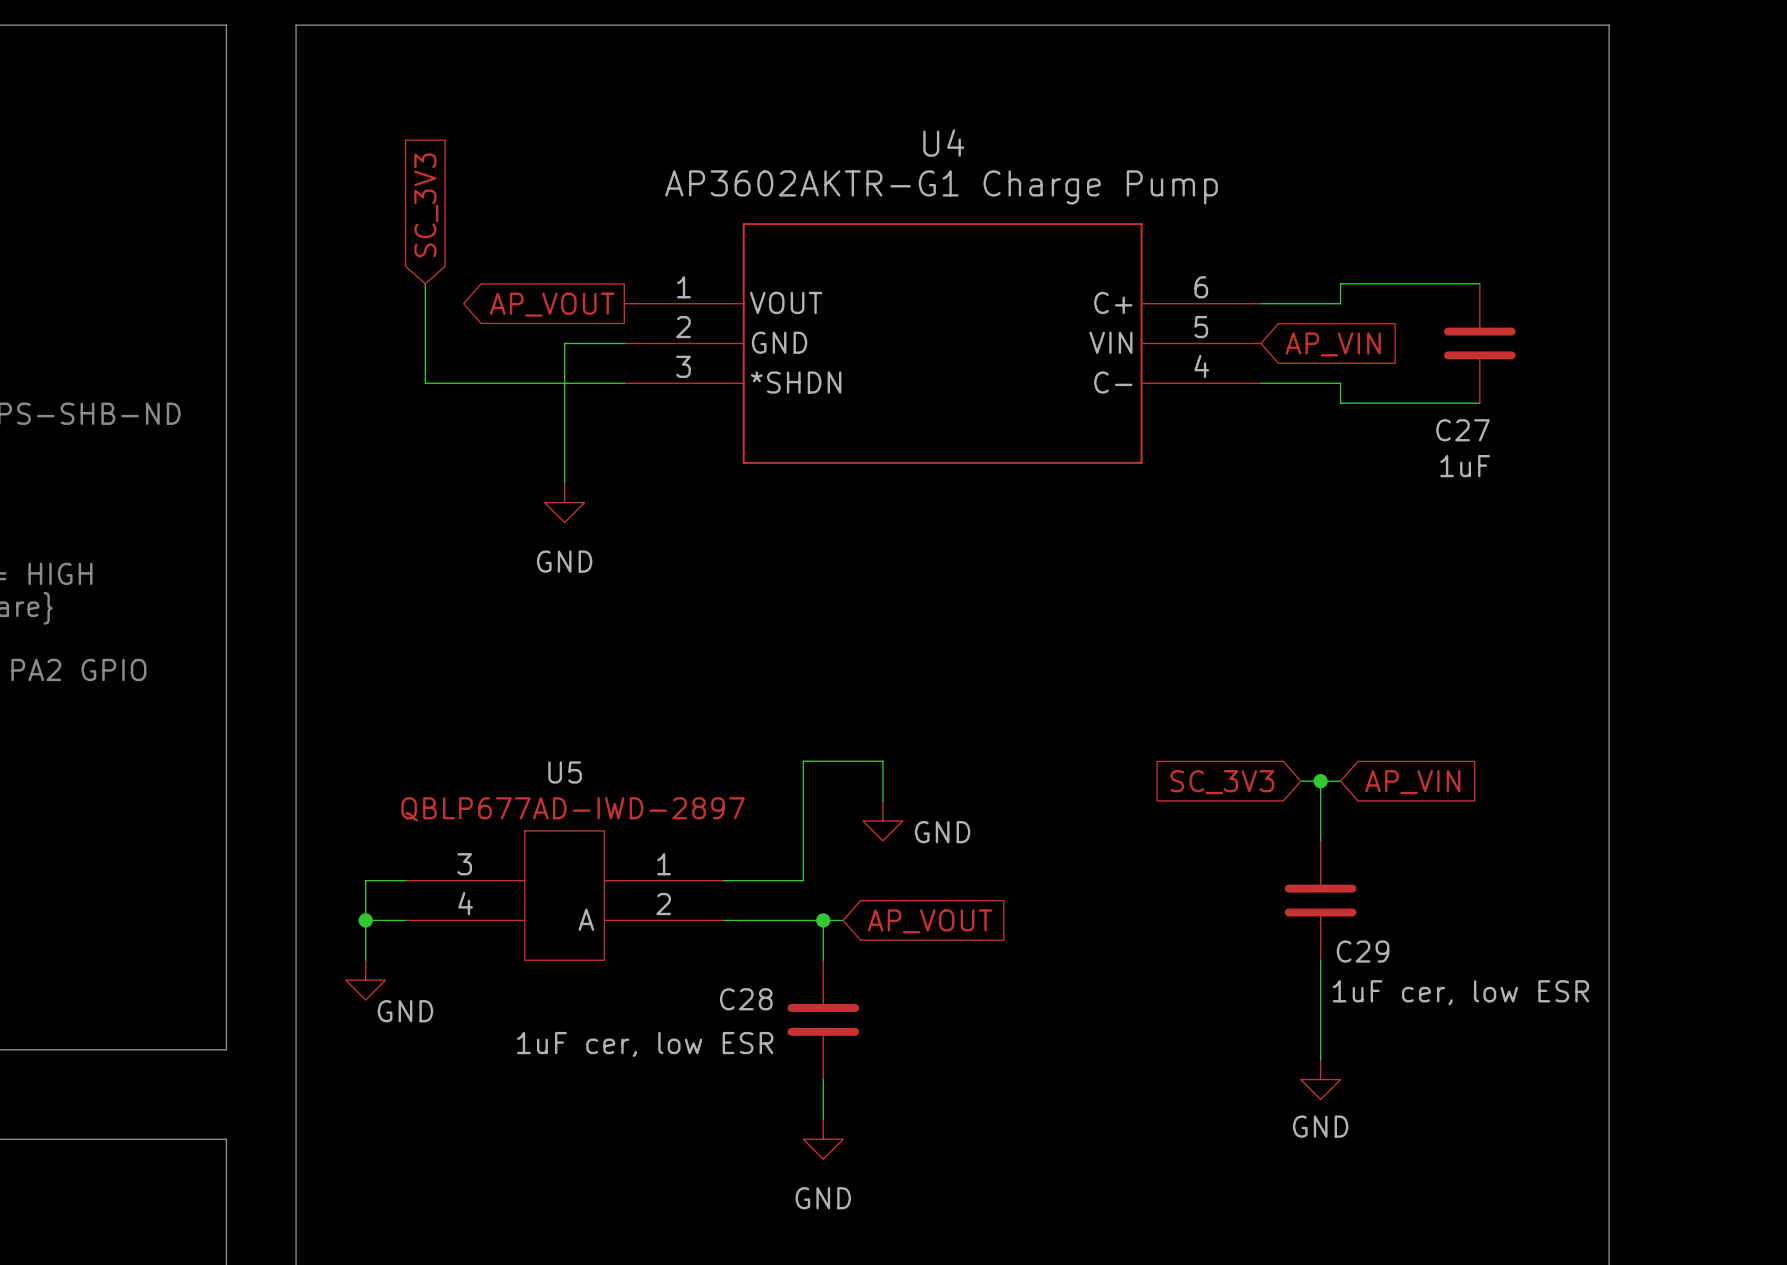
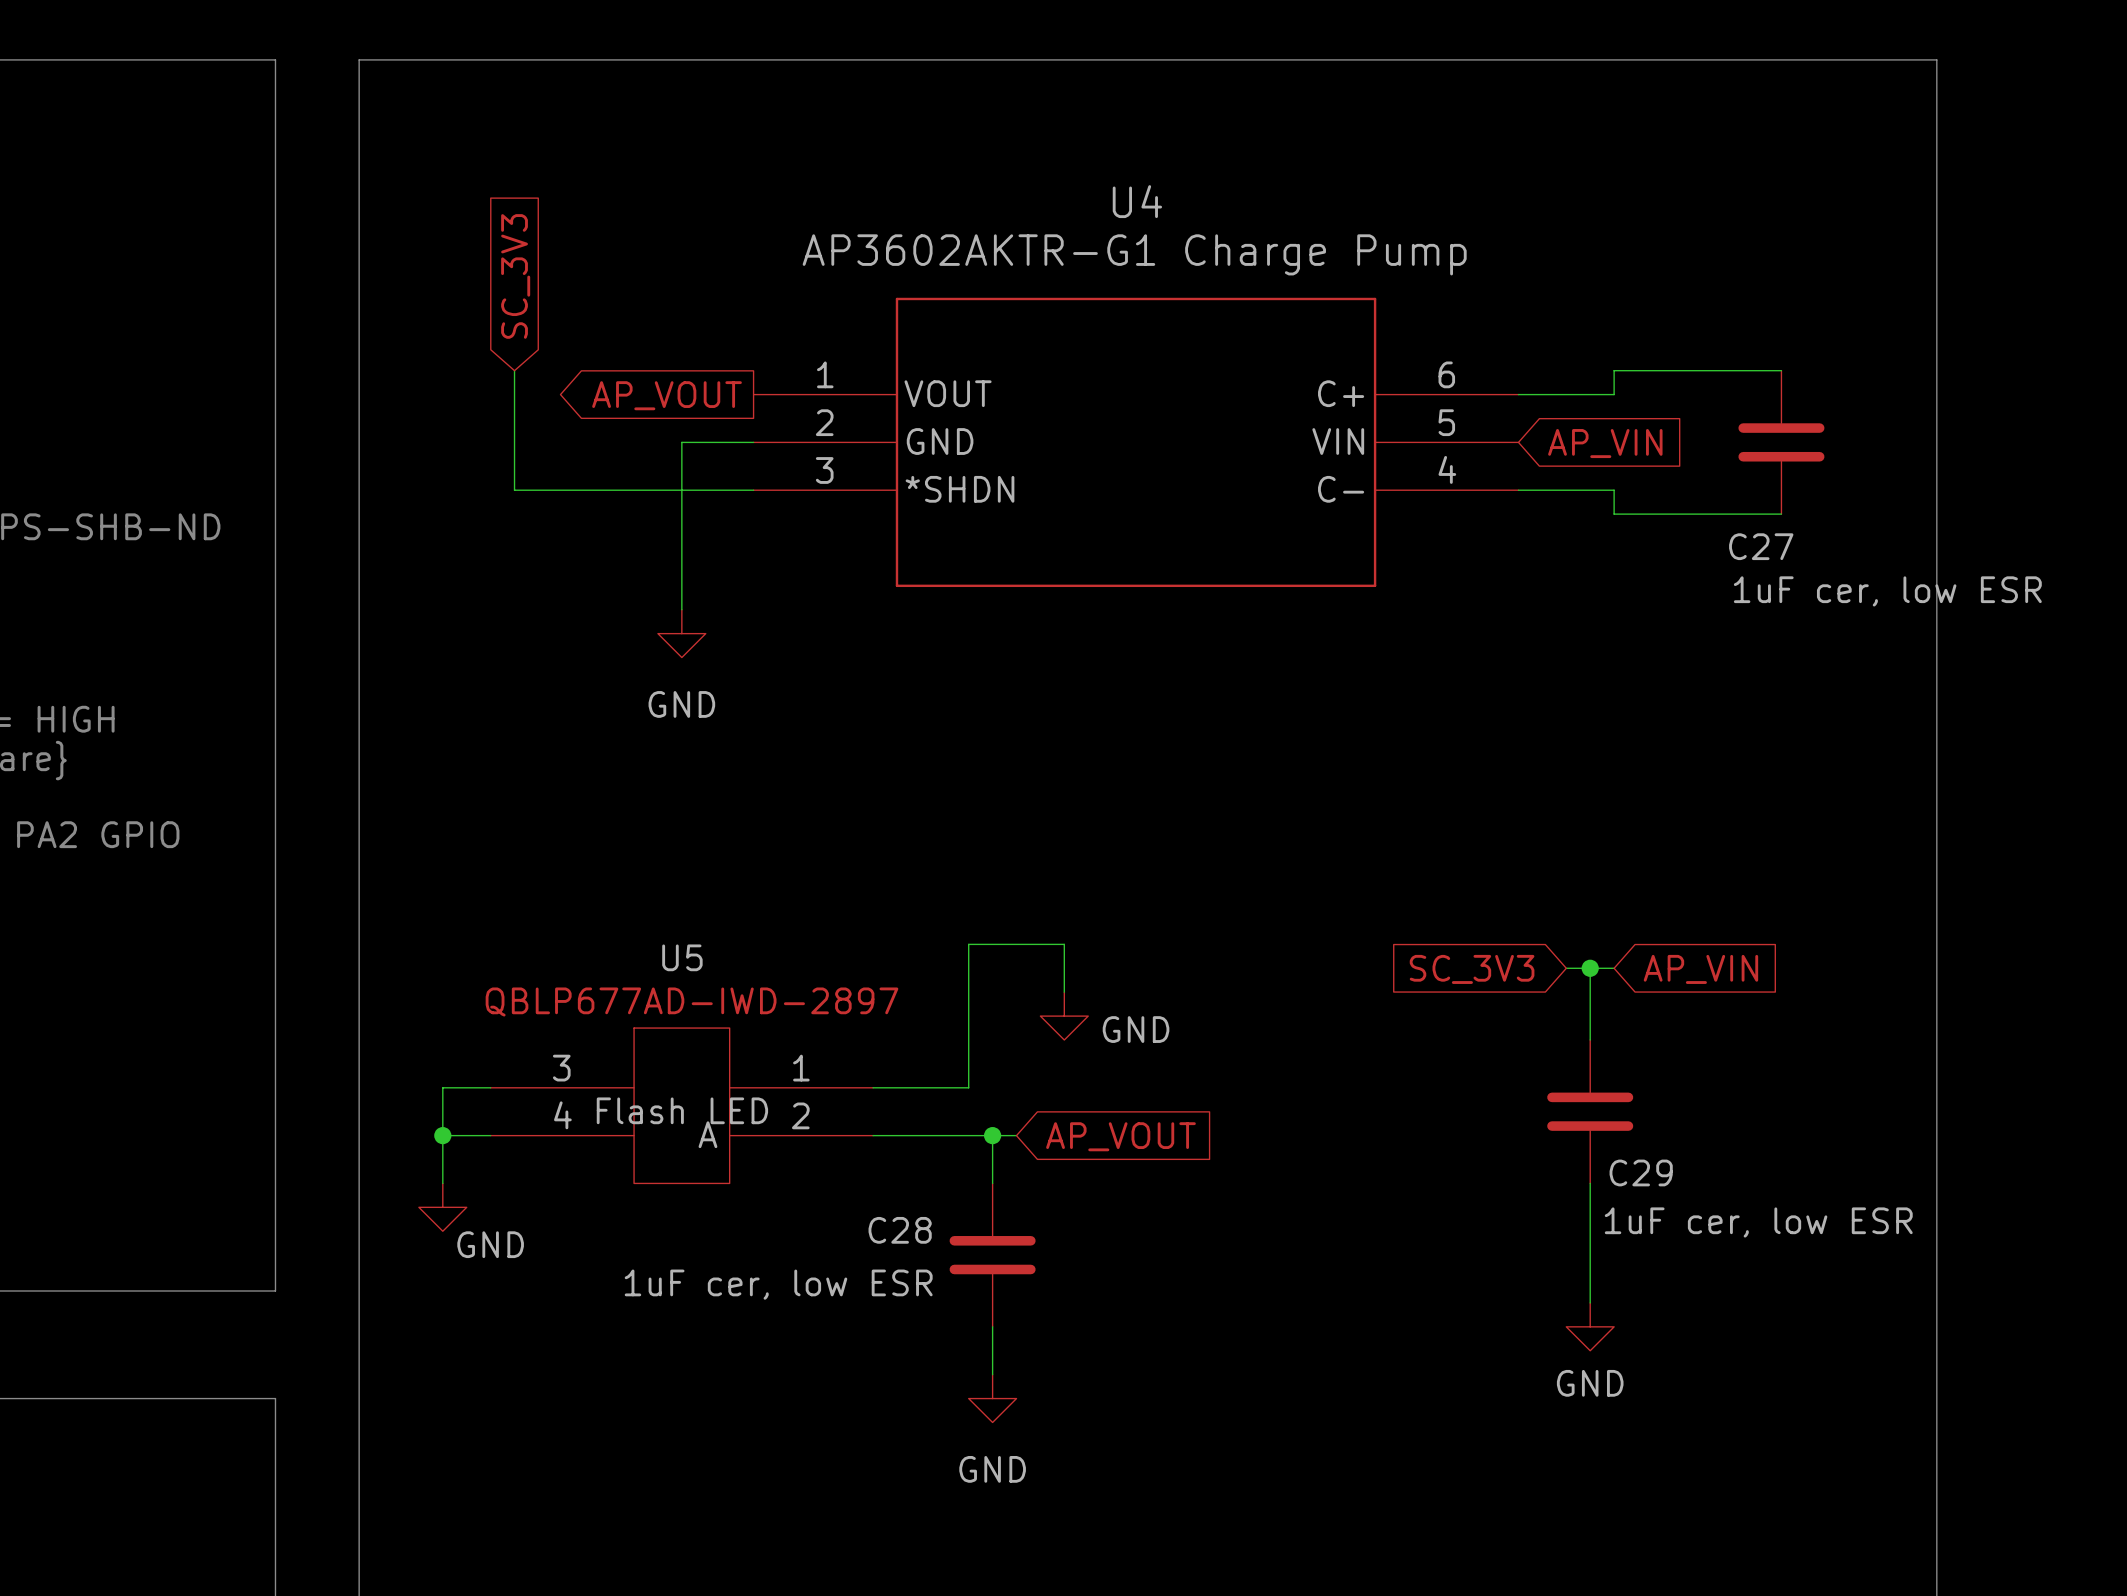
C27 value: 1uF (1465, 466) -> 1uF cer, low ESR (1887, 591)
U5 value: none -> Flash LED (682, 1110)

